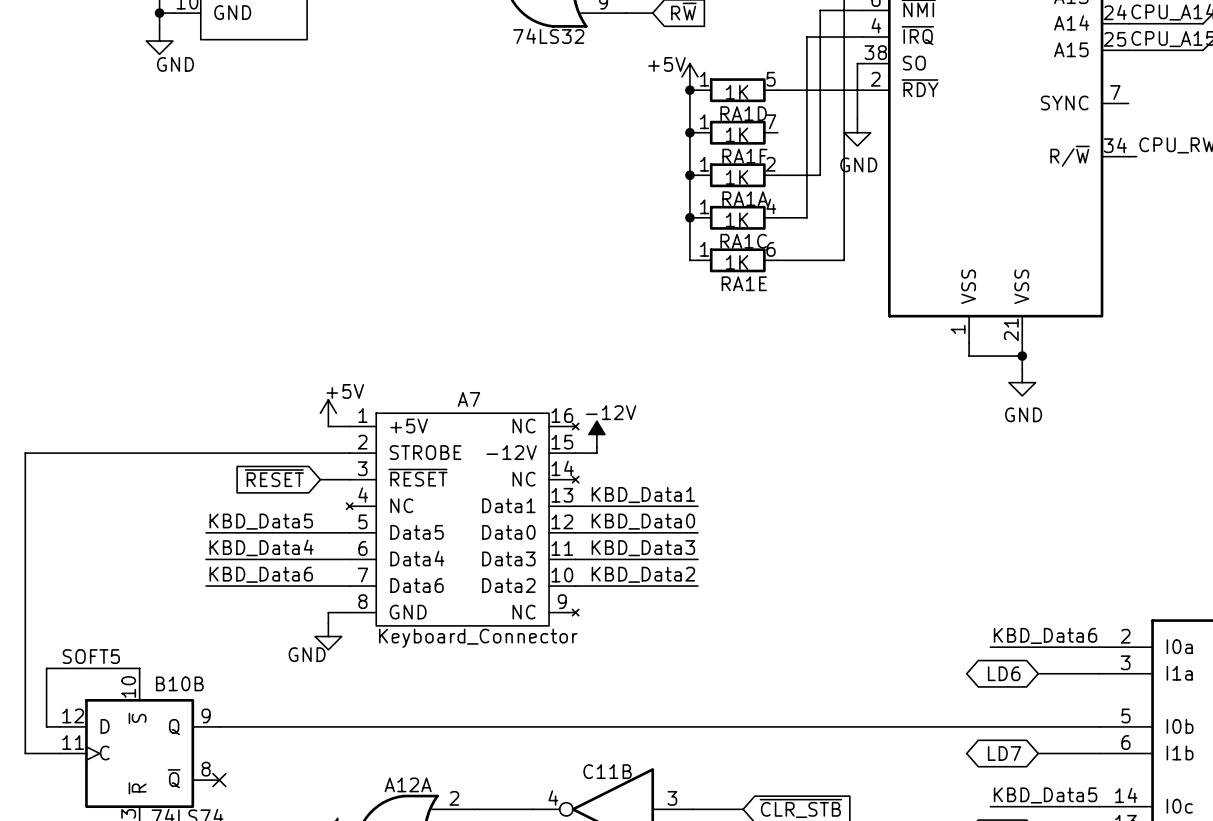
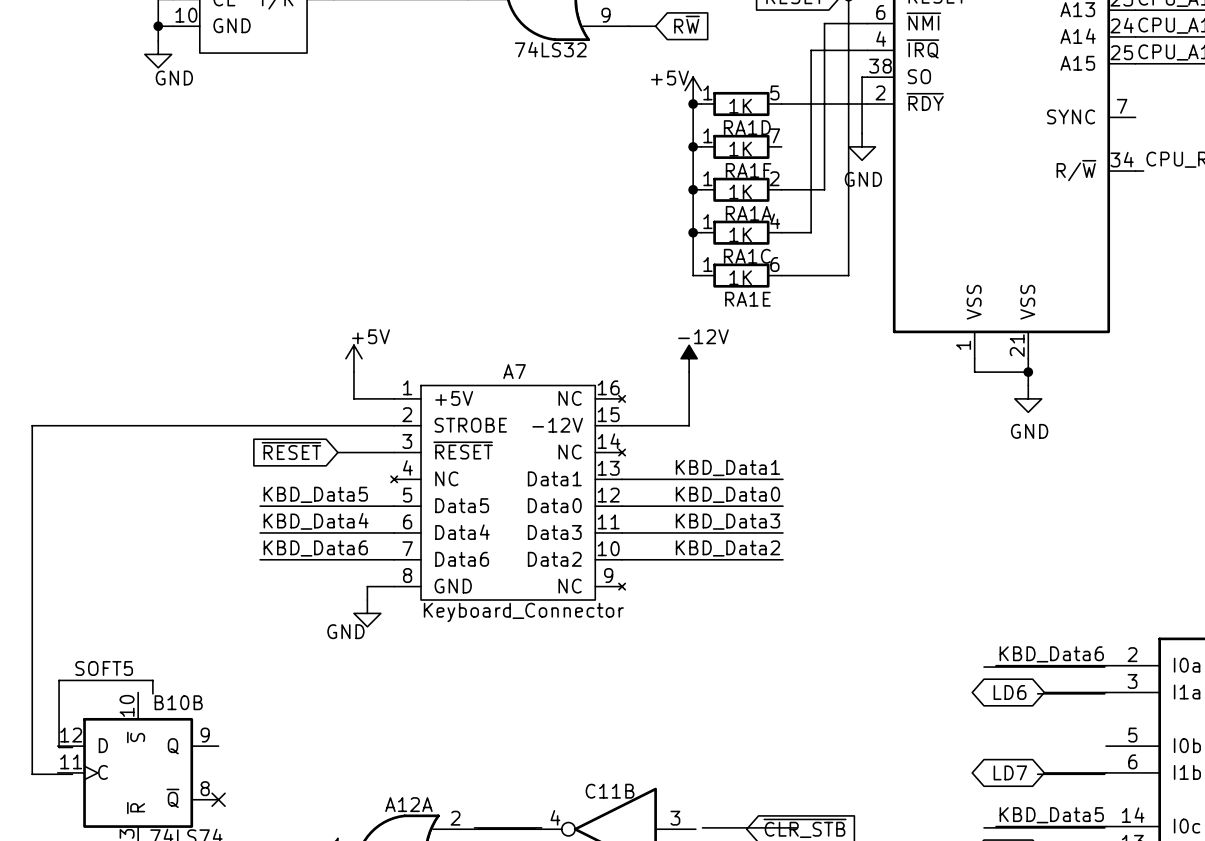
wire: none -> (353, 372) (353, 398) (394, 398)
wire: none -> (689, 372) (689, 425) (622, 425)
wire: none -> (394, 425) (32, 425) (32, 774) (72, 774)
power symbol position: +5V (328, 413) -> +5V (353, 358)
wire: (328, 426) (349, 426) -> none
power symbol position: -12V (596, 434) -> -12V (689, 358)
wire: none -> (337, 452) (394, 452)
wire: (596, 447) (596, 453) (575, 453) -> none
wire: (349, 453) (25, 453) (25, 753) (59, 753) -> none
wire: none -> (622, 479) (782, 479)
global label position: ~{RESET} (274, 478) -> ~{RESET} (291, 451)
wire: (320, 479) (349, 479) -> none
wire: none -> (260, 506) (394, 506)
wire: none -> (622, 506) (782, 506)
label position: KBD_Data1 (643, 495) -> KBD_Data1 (727, 468)
wire: (575, 506) (697, 506) -> none
wire: none -> (260, 532) (394, 532)
wire: none -> (622, 532) (782, 532)
A7 position: (462, 519) -> (508, 492)
label position: KBD_Data5 (261, 521) -> KBD_Data5 (315, 494)
label position: KBD_Data0 (643, 521) -> KBD_Data0 (727, 494)
wire: (206, 532) (349, 532) -> none
wire: (575, 532) (697, 532) -> none
wire: none -> (260, 559) (394, 559)
wire: none -> (622, 559) (782, 559)
label position: KBD_Data4 (261, 547) -> KBD_Data4 (316, 521)
label position: KBD_Data3 (643, 548) -> KBD_Data3 (727, 521)
wire: (206, 559) (349, 559) -> none
wire: (575, 559) (697, 559) -> none
wire: none -> (394, 586) (367, 586) (367, 600)
label position: KBD_Data6 (261, 574) -> KBD_Data6 (315, 548)
label position: KBD_Data2 (643, 574) -> KBD_Data2 (727, 548)
wire: (206, 586) (349, 586) -> none
wire: (575, 586) (697, 586) -> none
wire: (349, 612) (328, 612) (328, 623) -> none
power symbol position: GND (328, 636) -> GND (367, 613)
wire: none -> (984, 667) (1104, 667)
label position: SOFT5 (91, 656) -> SOFT5 (104, 668)
wire: (139, 673) (139, 668) (46, 668) (46, 726) (59, 726) -> none
wire: none -> (152, 693) (152, 680) (59, 680) (59, 747) (72, 747)
wire: none -> (1037, 693) (1104, 693)
wire: (219, 726) (1099, 726) -> none
wire: none -> (1037, 774) (1104, 774)
wire: none -> (474, 827) (541, 827)
wire: none -> (702, 827) (796, 827)
wire: none -> (984, 827) (1104, 827)
wire: (692, 809) (743, 809) -> none

